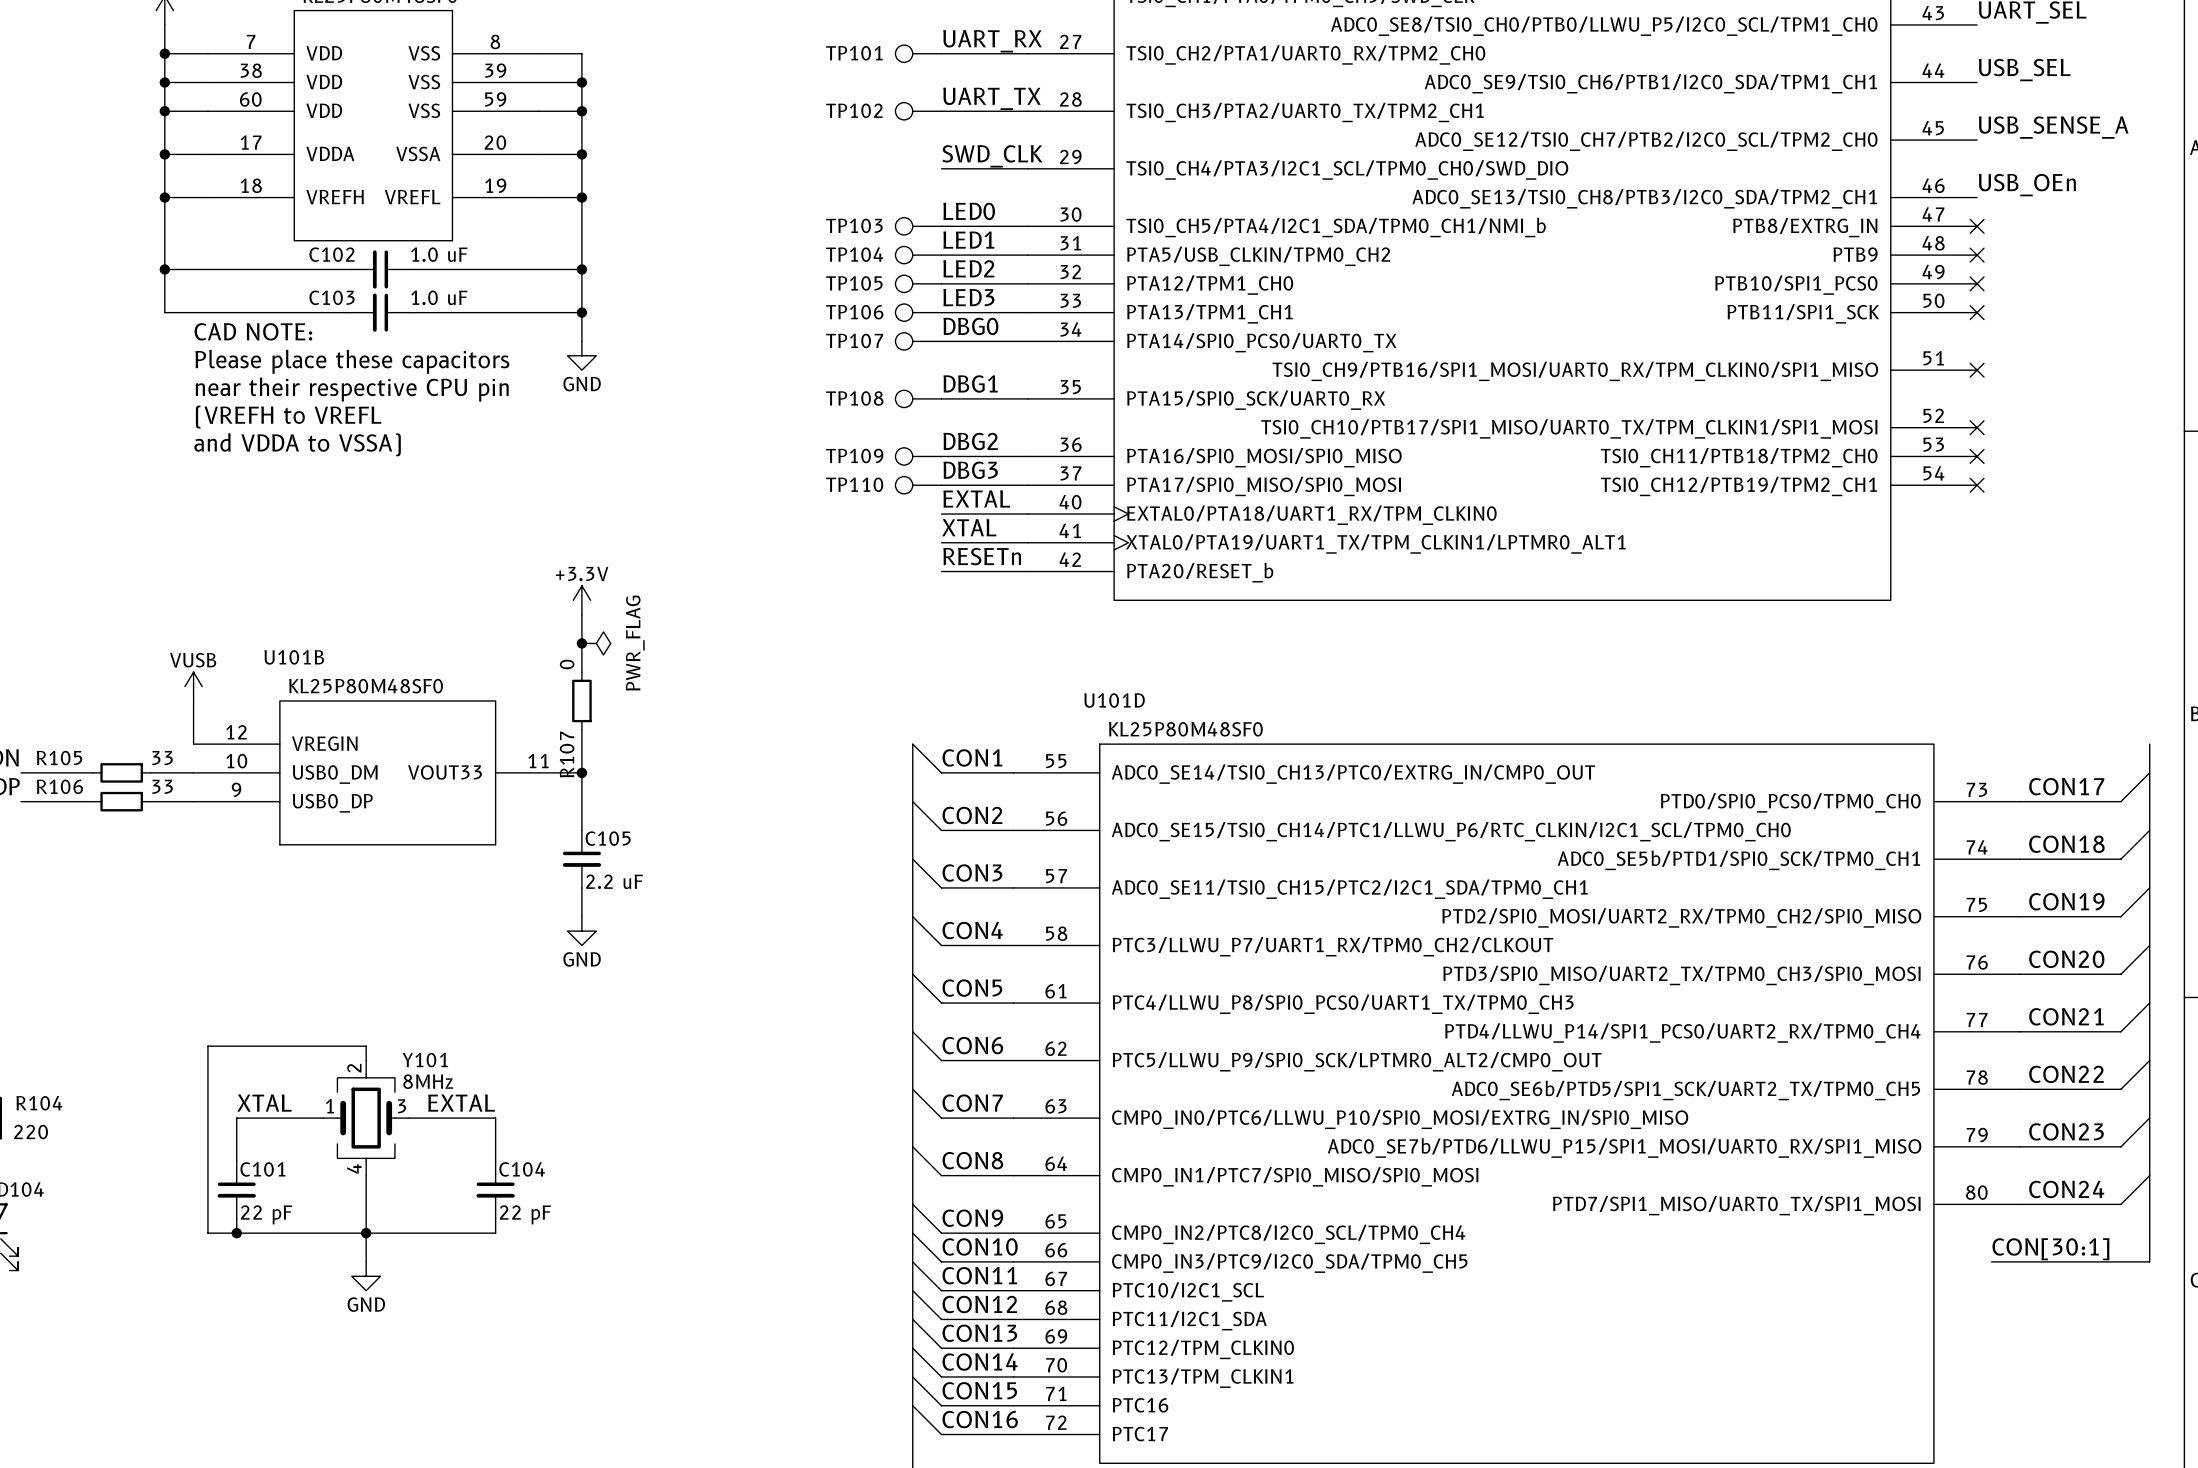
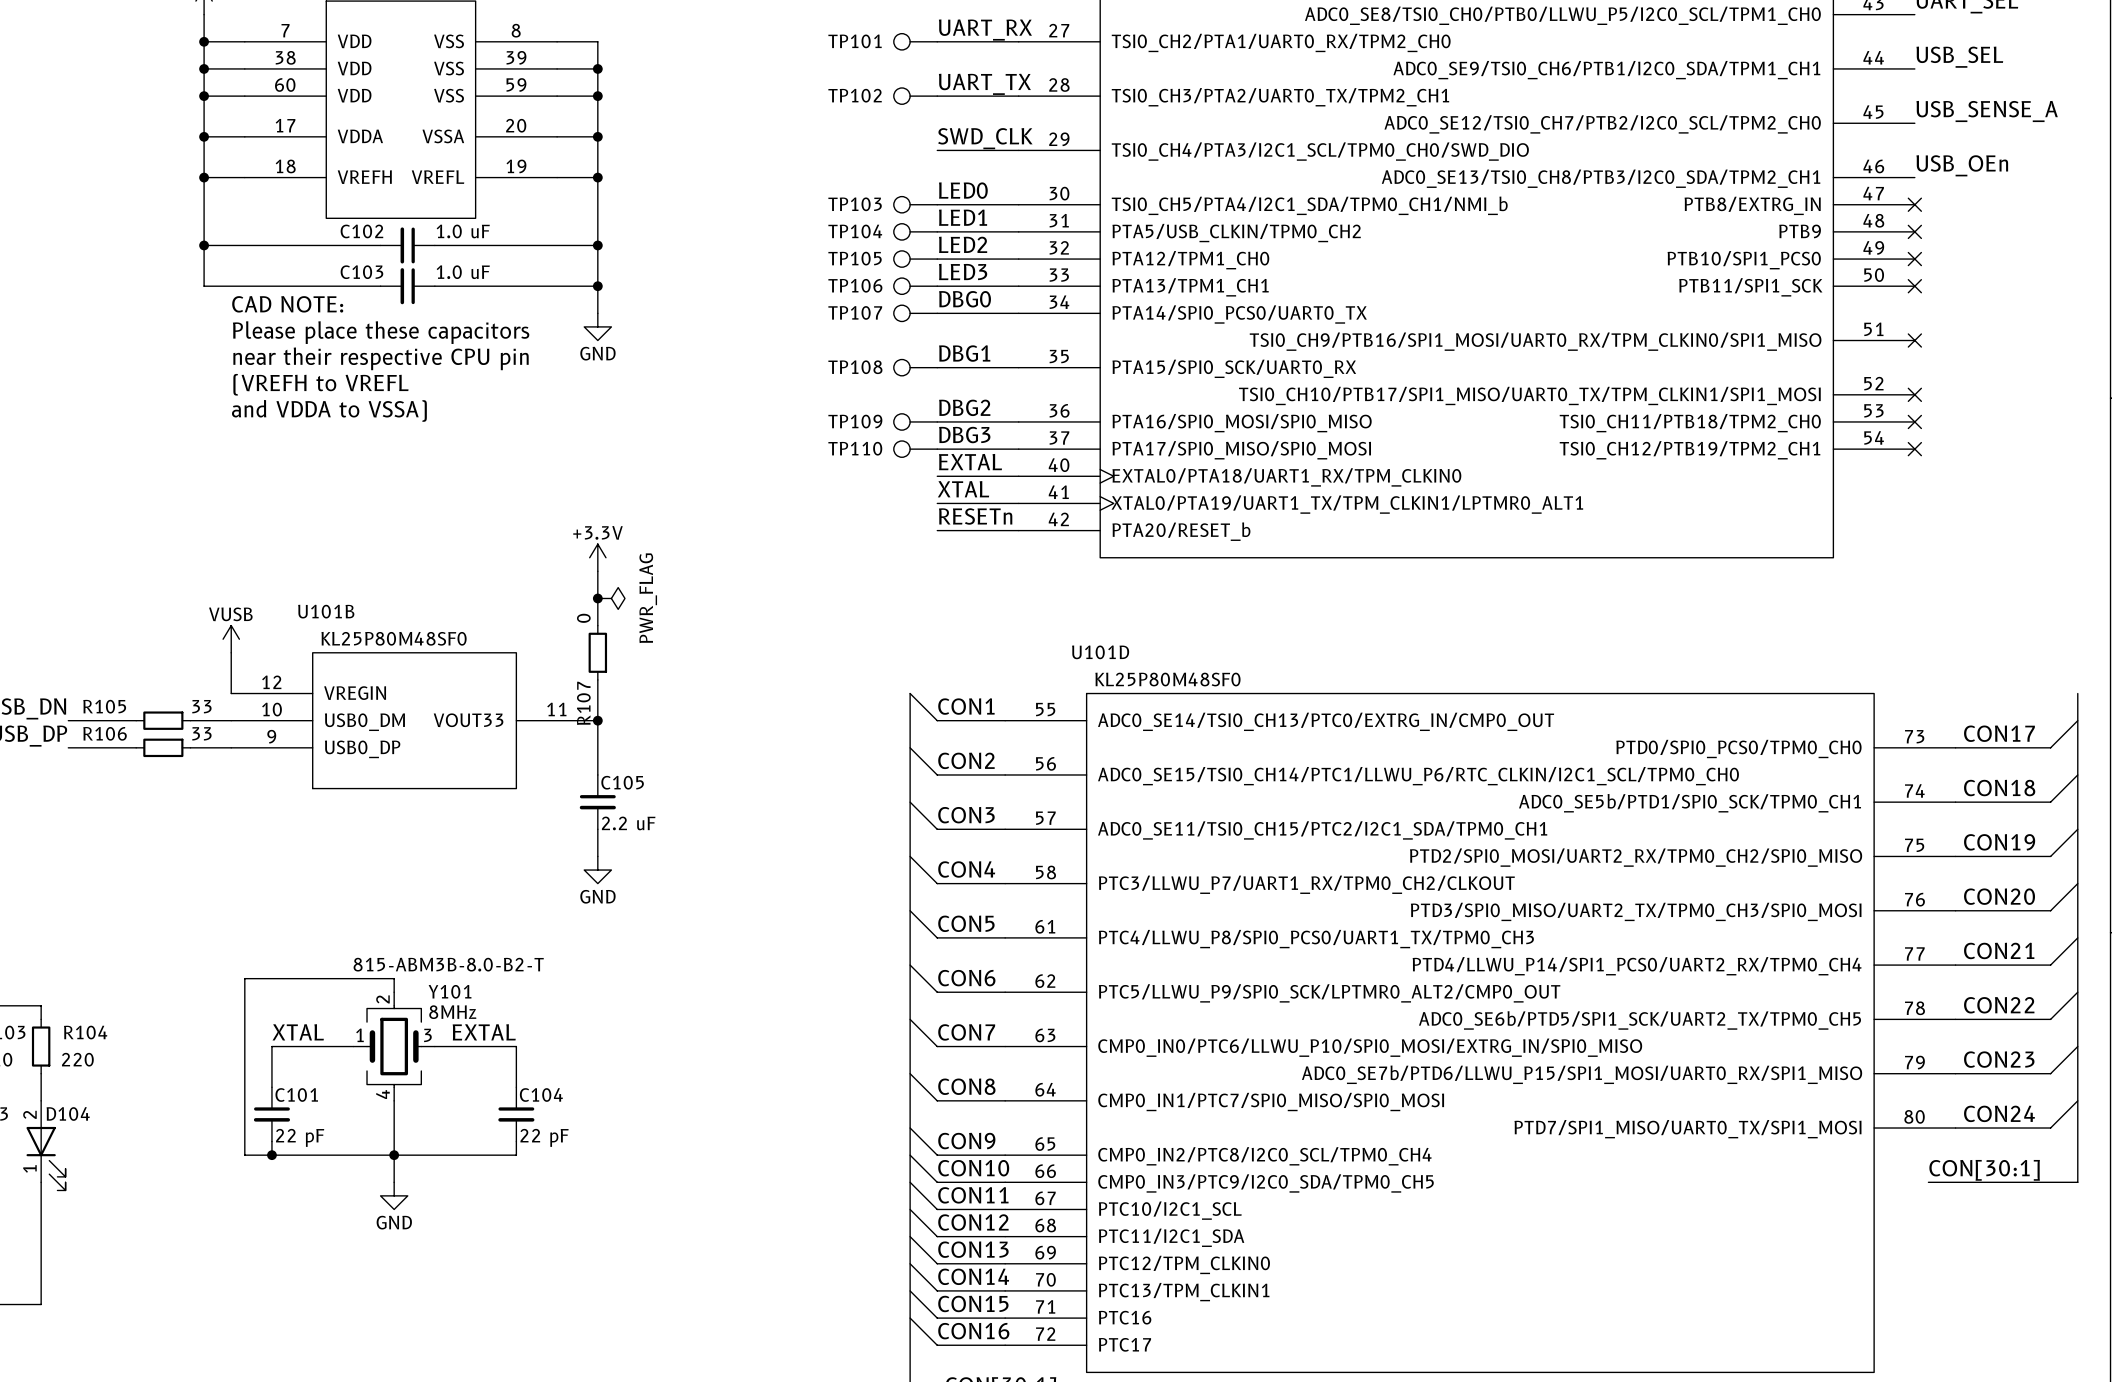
Y101 text: none -> 815-ABM3B-8.0-B2-T (448, 964)

